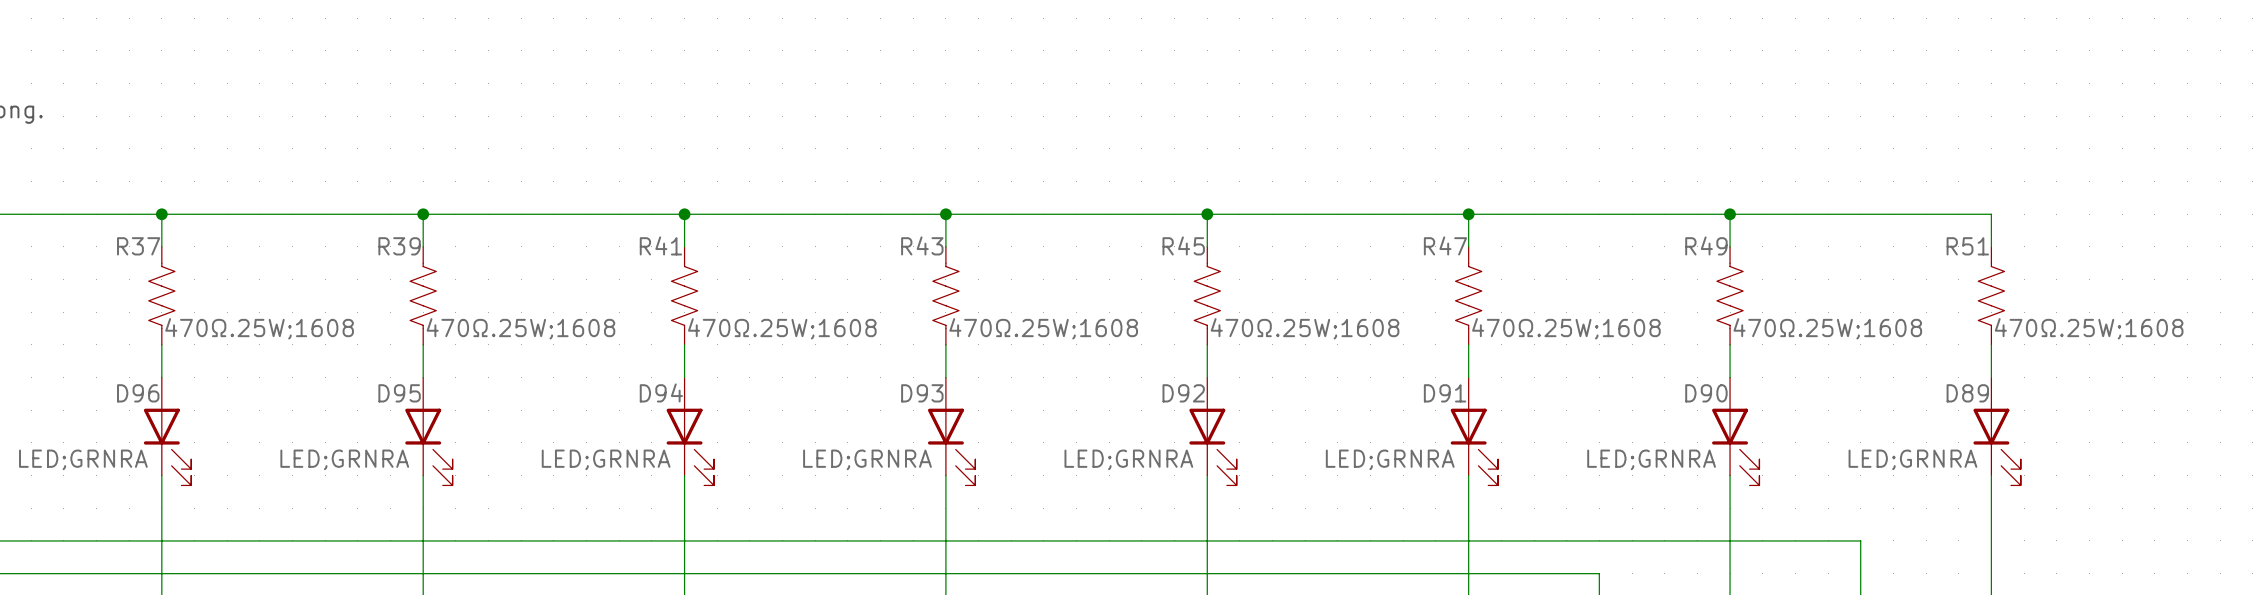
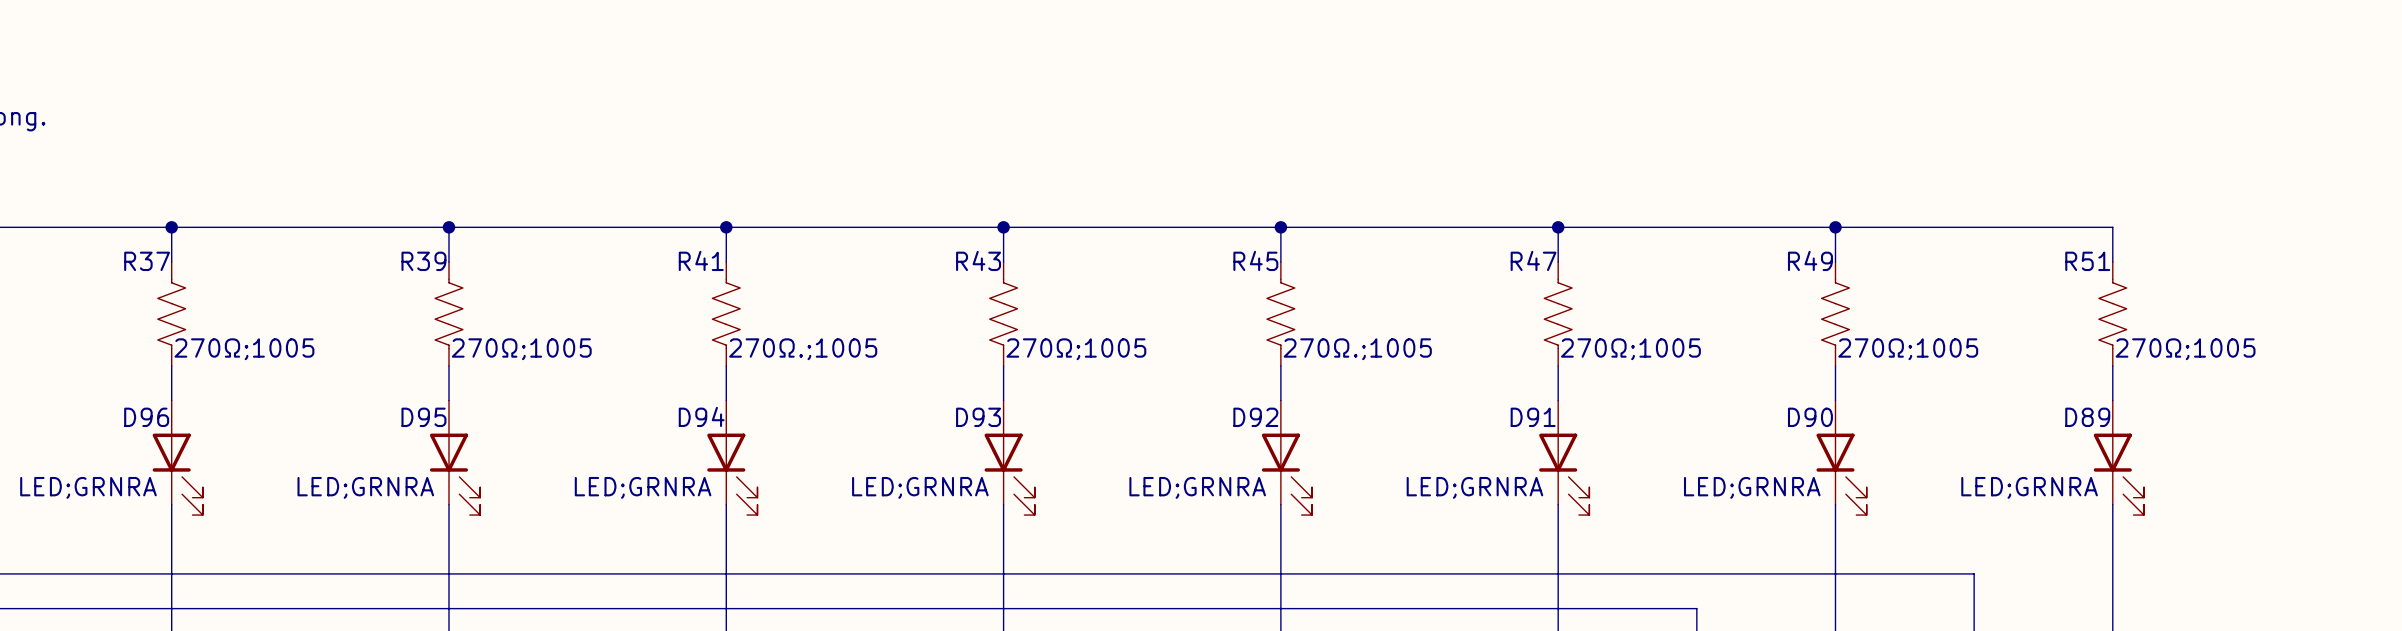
R37 value: 470Ω.25W;1608 (259, 328) -> 270Ω;1005 (244, 349)
R39 value: 470Ω.25W;1608 (520, 328) -> 270Ω;1005 (521, 349)
R41 value: 470Ω.25W;1608 (782, 328) -> 270Ω.;1005 (803, 349)
R43 value: 470Ω.25W;1608 (1043, 328) -> 270Ω;1005 (1076, 349)
R45 value: 470Ω.25W;1608 (1305, 328) -> 270Ω.;1005 (1357, 349)
R47 value: 470Ω.25W;1608 (1566, 328) -> 270Ω;1005 (1630, 349)
R49 value: 470Ω.25W;1608 (1827, 328) -> 270Ω;1005 (1908, 349)
R51 value: 470Ω.25W;1608 (2089, 328) -> 270Ω;1005 (2185, 349)

